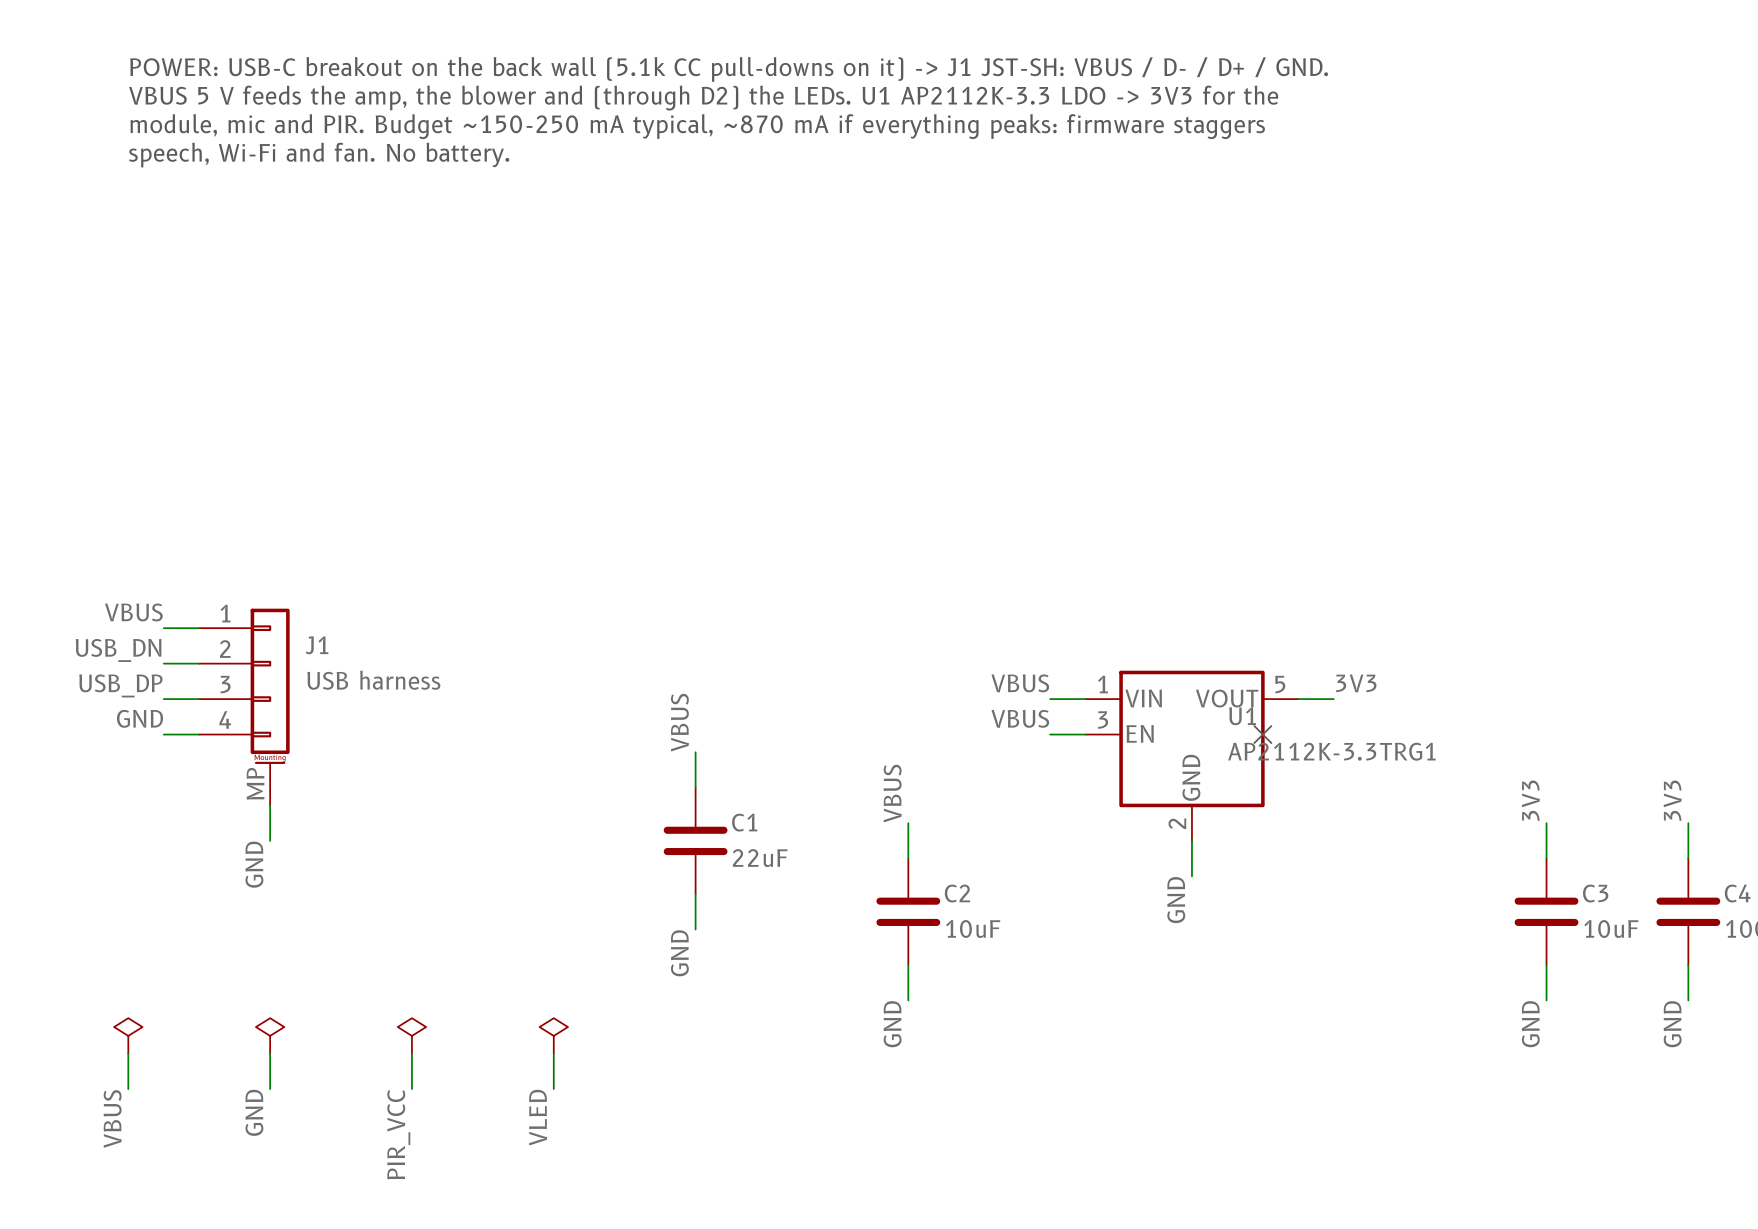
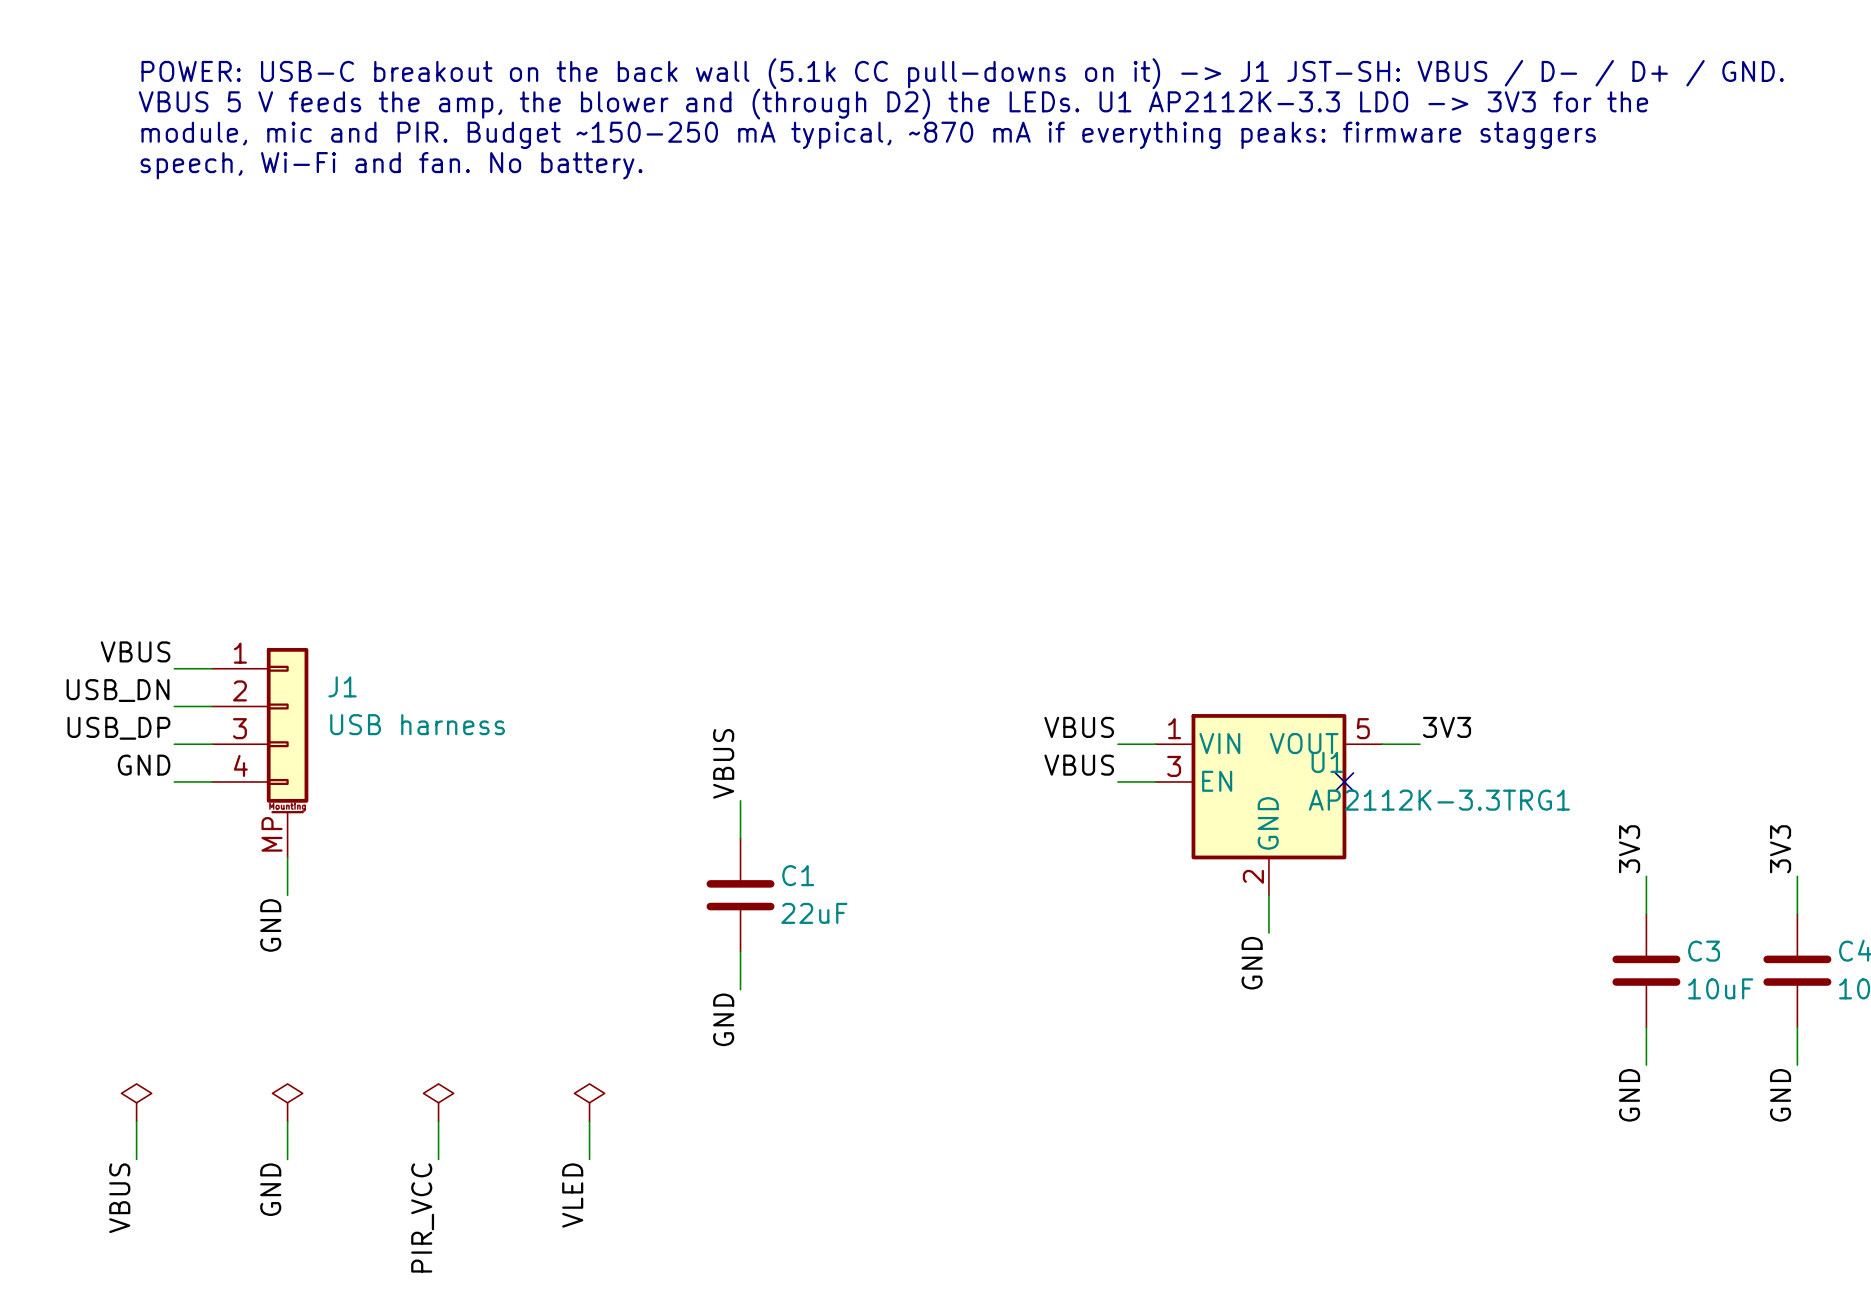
label: VBUS (892, 793) -> none
wire: (908, 823) (908, 858) -> none
C2: 10uF (908, 911) -> none
wire: (908, 965) (908, 1000) -> none
label: GND (892, 1024) -> none

